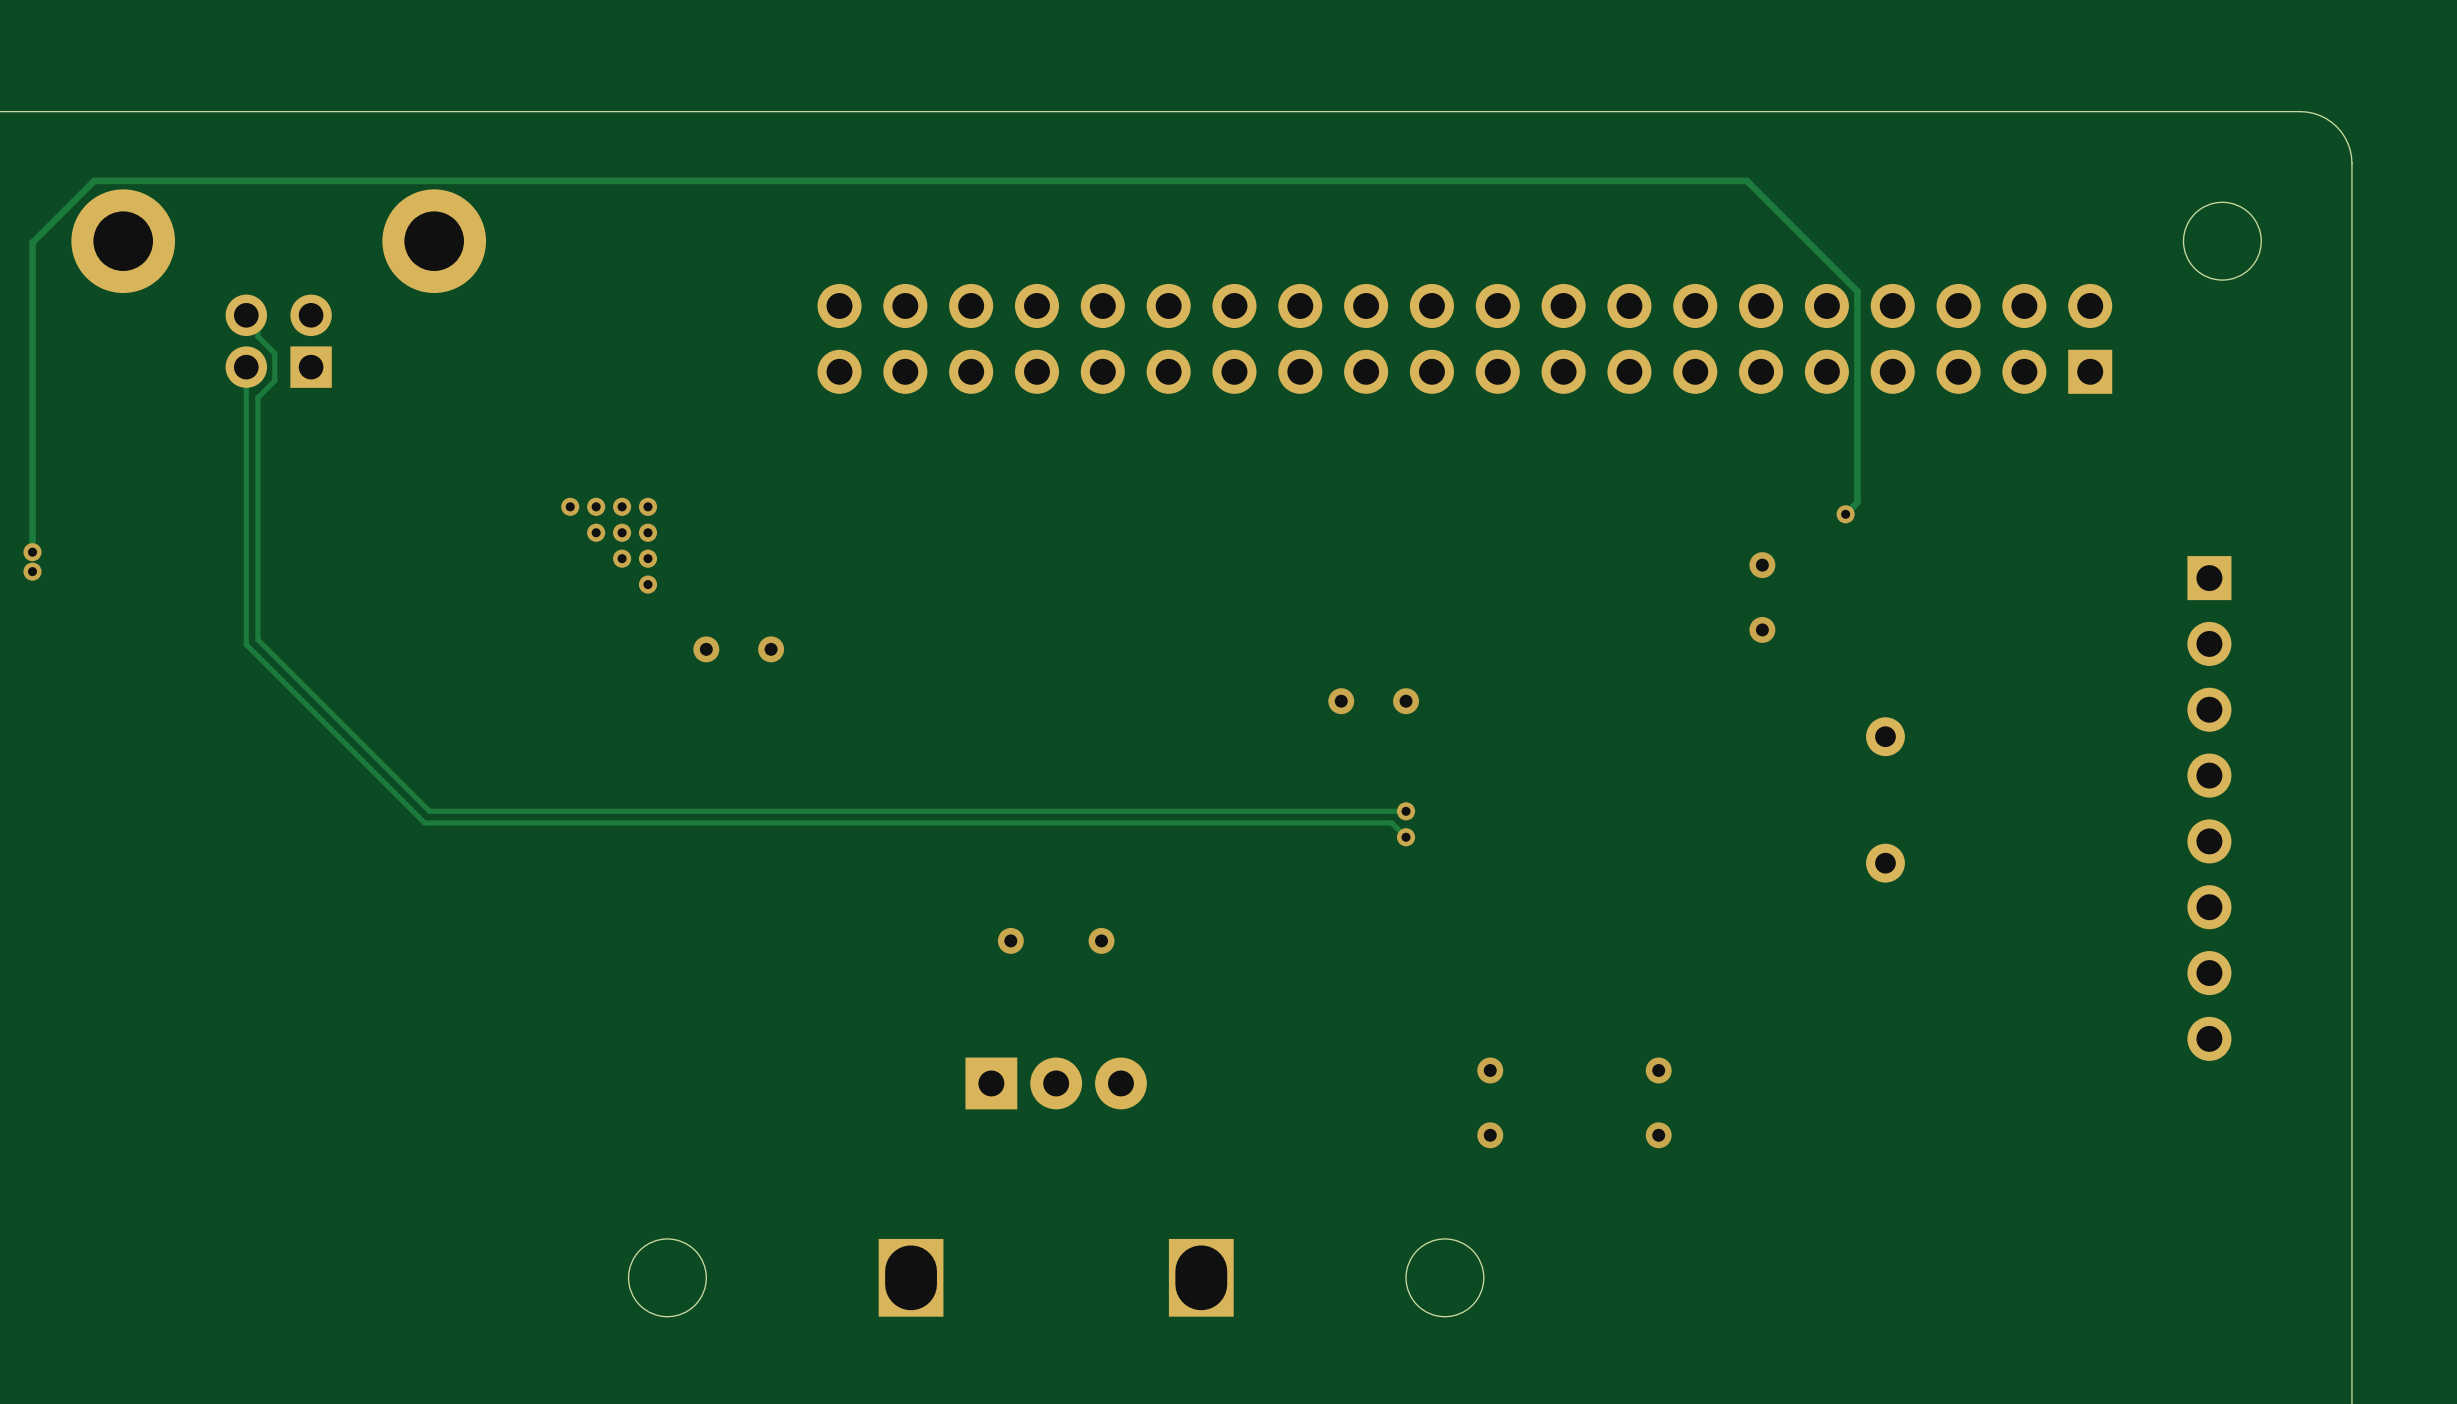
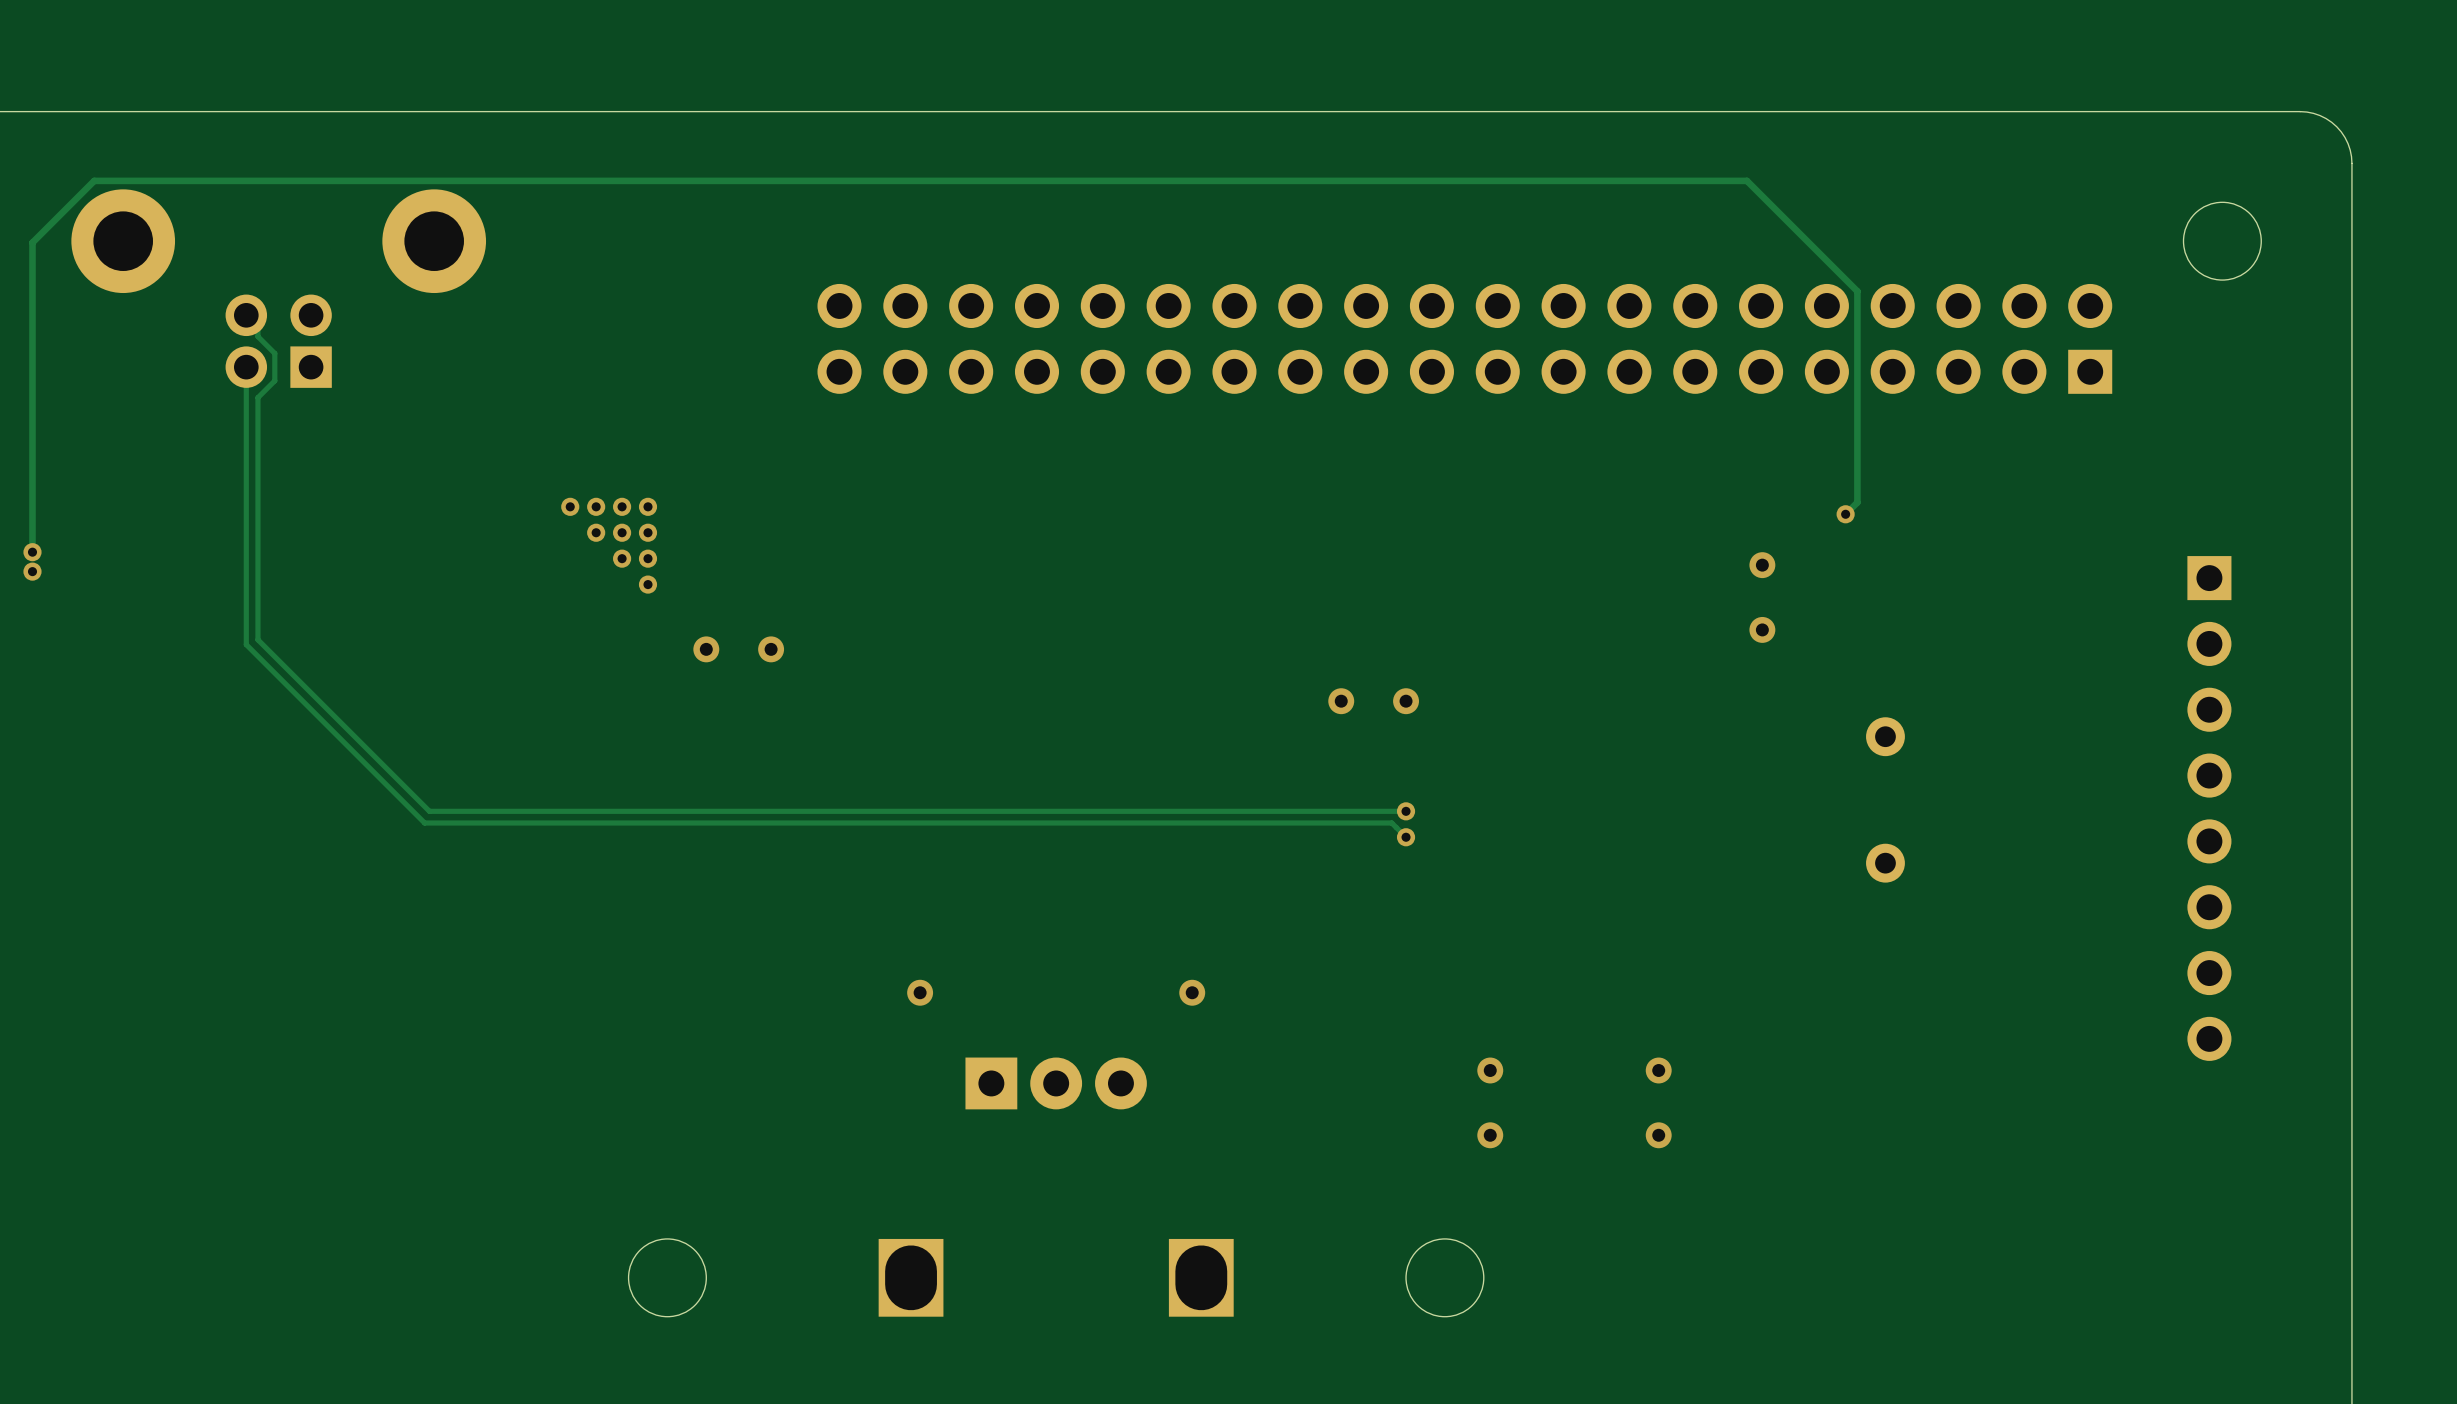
via: (1010, 940) -> none
via: (1101, 940) -> none
via: none -> (920, 992)
via: none -> (1192, 992)

